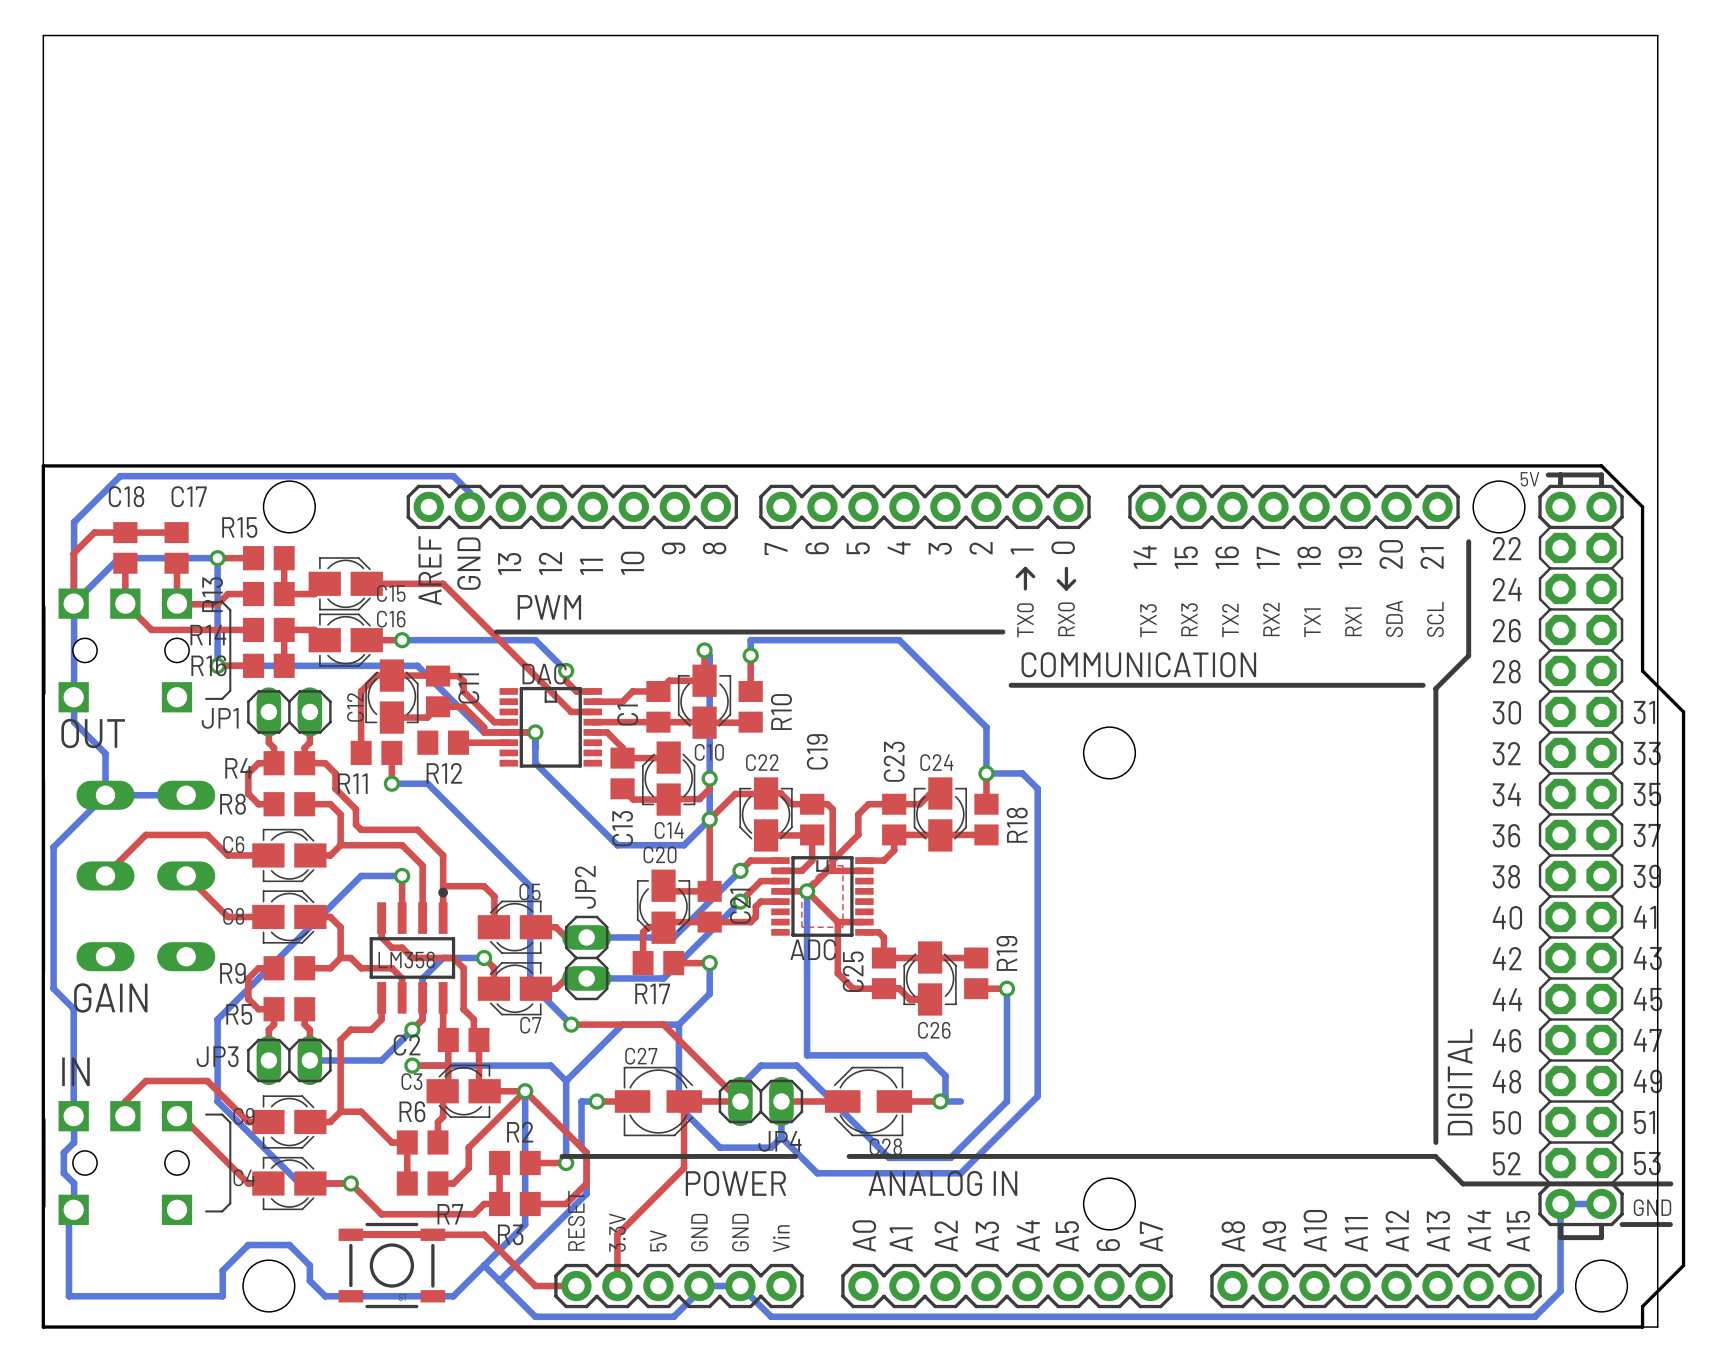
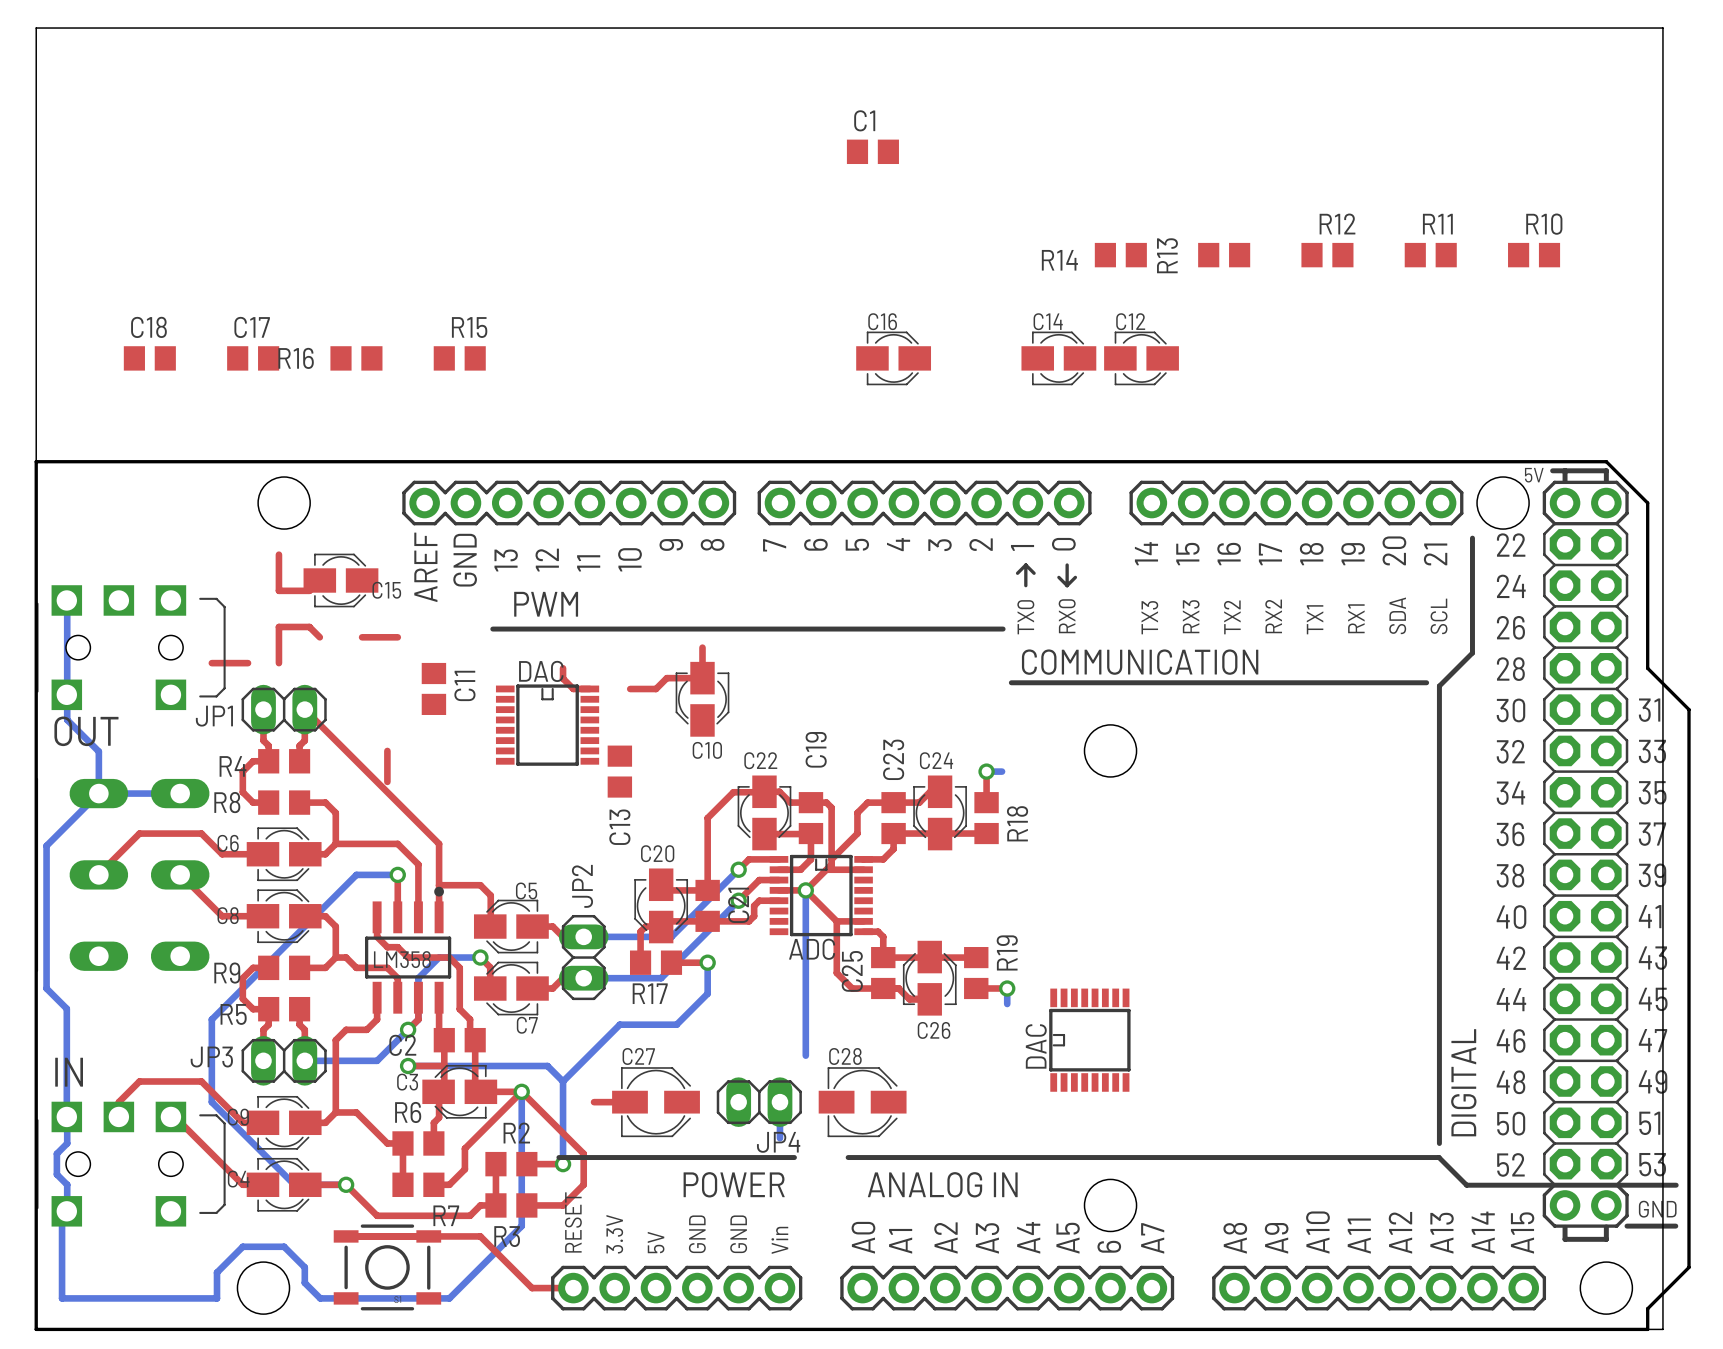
bottom track: (469, 506) (469, 492) (453, 476) (120, 476) (74, 522) (74, 603) -> none
R15 name position: R15 (239, 527) -> R15 (469, 327)
top track: (176, 532) (94, 532) (73, 553) (73, 603) -> none
C18 rotation: 0° (125, 547) -> 90° clockwise (149, 358)
C18 position: (125, 547) -> (149, 358)
C17 rotation: 0° (176, 547) -> 90° clockwise (253, 358)
C17 position: (176, 547) -> (253, 358)
top track: (217, 558) (253, 558) -> none
via: (217, 558) -> none
R15 position: (268, 558) -> (459, 358)
top track: (125, 563) (125, 603) (151, 629) (253, 629) -> none
top track: (176, 563) (177, 604) (217, 604) (227, 594) (253, 594) -> none
top track: (366, 583) (443, 583) (571, 711) (592, 711) -> none
R13 position: (268, 594) -> (1224, 255)
bottom track: (73, 603) (119, 558) (217, 558) (217, 665) (417, 665) (484, 732) (535, 732) (535, 763) (617, 845) (684, 845) (709, 819) (709, 655) (704, 650) -> none
C16 name position: C16 (391, 619) -> C16 (882, 321)
R14 position: (268, 629) -> (1120, 255)
C16 position: (345, 640) -> (893, 358)
bottom track: (402, 640) (535, 640) (566, 670) -> none
via: (402, 640) -> none
via: (704, 650) -> none
top track: (750, 655) (750, 691) -> none
bottom track: (750, 655) (750, 640) (899, 640) (986, 727) (986, 773) -> none
via: (750, 655) -> none
via: (217, 665) -> none
R16 position: (268, 665) -> (356, 358)
via: (566, 670) -> none
top track: (458, 676) (376, 675) (361, 691) (361, 752) -> none
top track: (458, 676) (463, 681) (463, 691) (494, 722) (508, 722) -> none
top track: (632, 691) (622, 701) (592, 701) -> none
C12 rotation: 0° (391, 696) -> 90° clockwise (1141, 358)
C12 position: (391, 696) -> (1141, 358)
C1 rotation: 0° (658, 706) -> 90° clockwise (872, 151)
C1 position: (658, 706) -> (872, 151)
R10 rotation: 0° (750, 706) -> 90° clockwise (1534, 255)
R10 position: (750, 706) -> (1534, 255)
top track: (391, 717) (427, 717) (438, 706) (463, 706) (484, 727) (484, 732) (535, 732) -> none
top track: (592, 722) (750, 722) -> none
via: (535, 732) -> none
top track: (592, 732) (607, 732) (622, 747) (622, 758) (668, 757) -> none
R12 position: (443, 742) -> (1327, 255)
top track: (458, 742) (508, 742) -> none
R11 position: (376, 752) -> (1430, 255)
top track: (304, 763) (325, 763) (335, 773) (335, 788) (356, 809) (356, 824) (361, 829) (417, 829) (443, 855) -> (304, 709) (439, 843) (439, 854)
R12 name position: R12 (444, 773) -> R12 (1337, 224)
bottom track: (1001, 773) (1022, 773) (1037, 788) (1037, 1096) (960, 1173) (817, 1173) (781, 1137) (771, 1147) (719, 1147) (678, 1106) (678, 1024) -> none
C14 rotation: 0° (668, 778) -> 90° clockwise (1058, 358)
C14 position: (668, 778) -> (1058, 358)
top track: (709, 778) (709, 788) (699, 799) (633, 799) (622, 788) -> none
via: (709, 778) -> none
R11 name position: R11 (352, 783) -> R11 (1437, 224)
bottom track: (391, 783) (427, 783) (530, 886) (530, 983) (571, 1024) -> none
via: (391, 783) -> none
via: (709, 819) -> none
C14 name position: C14 (669, 830) -> C14 (1048, 321)
top zone outline: (827, 865) (801, 891) (801, 927) (842, 927) (842, 865) (827, 865) -> none
text: GAIN (110, 997) -> none
bottom track: (1006, 1004) (1006, 1101) (950, 1157) (889, 1157) (796, 1065) (760, 1065) (740, 1086) (740, 1101) -> none
top track: (571, 1024) (663, 1024) (740, 1101) (684, 1101) -> none
via: (571, 1024) -> none
DAC: none -> (1089, 1040)
bottom track: (807, 1055) (924, 1055) (945, 1075) (945, 1096) (940, 1101) (960, 1101) -> none
bottom track: (596, 1101) (581, 1101) (581, 1147) (586, 1152) (586, 1193) (499, 1280) -> none
via: (596, 1101) -> none
top track: (684, 1101) (684, 1168) (617, 1234) (617, 1286) -> none
top track: (781, 1101) (842, 1101) -> none
C28 rotation: 0° (868, 1101) -> 180° (862, 1102)
top track: (894, 1101) (940, 1101) -> none
via: (940, 1101) -> none
bottom track: (1601, 1204) (1560, 1204) (1560, 1291) (1534, 1316) (771, 1316) (740, 1286) (699, 1286) (699, 1291) (673, 1316) (535, 1316) (484, 1265) -> none

